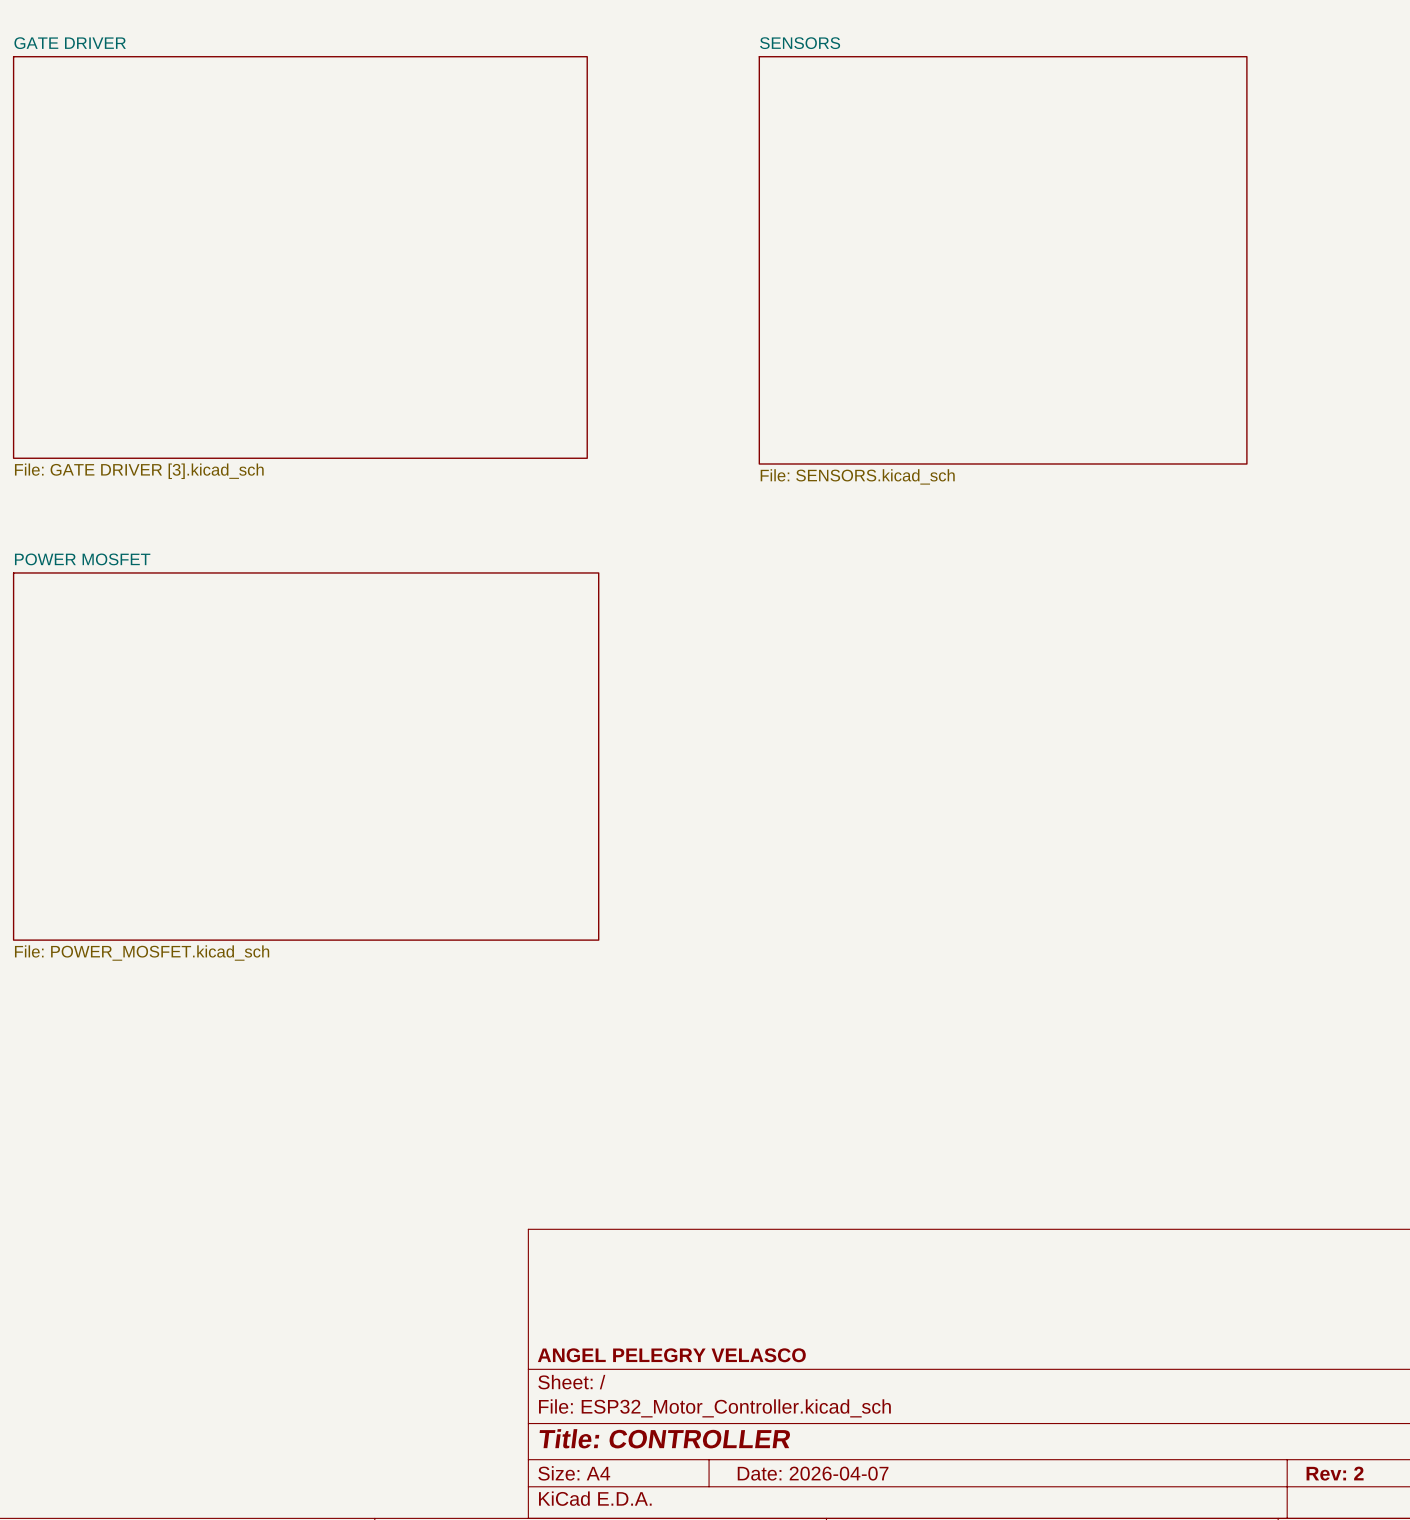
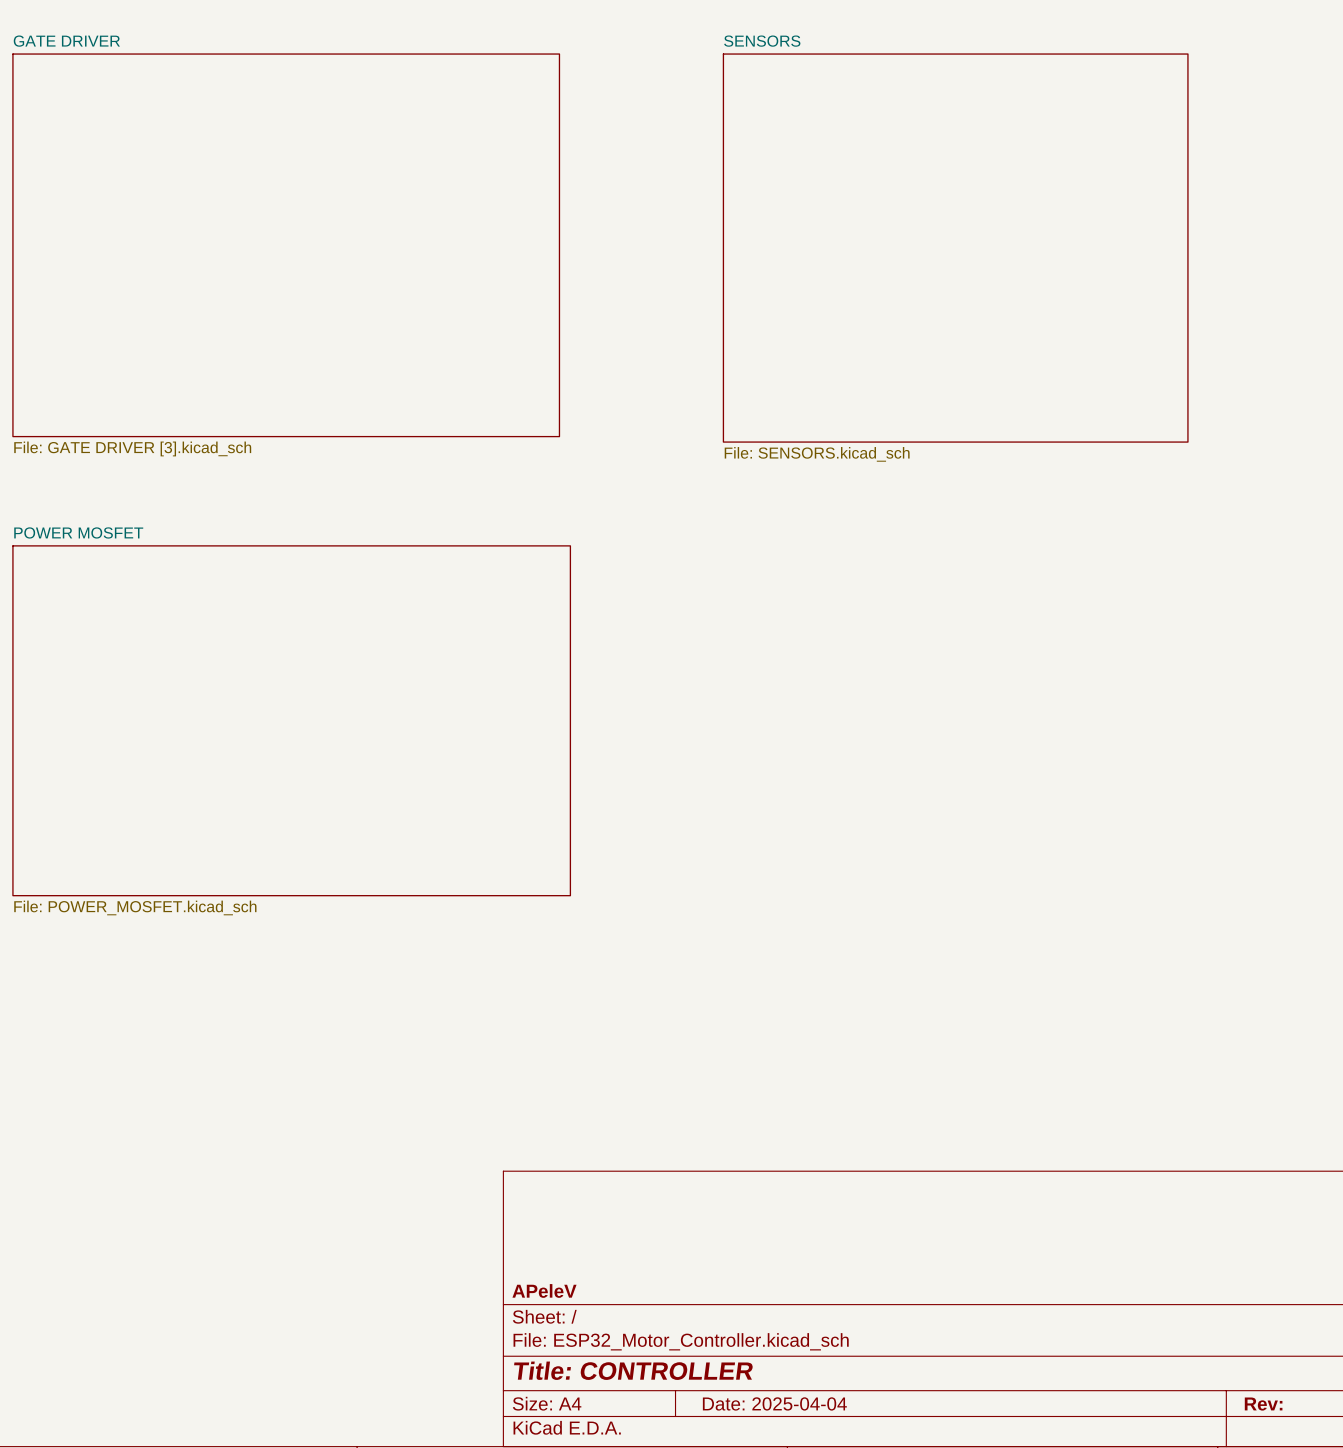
title block: ANGEL PELEGRY VELASCO (671, 1355) -> APeleV (544, 1290)
title block: Date: 2026-04-07 (813, 1473) -> Date: 2025-04-04 (774, 1403)
title block: Rev: 2 (1335, 1473) -> Rev: (1263, 1404)

